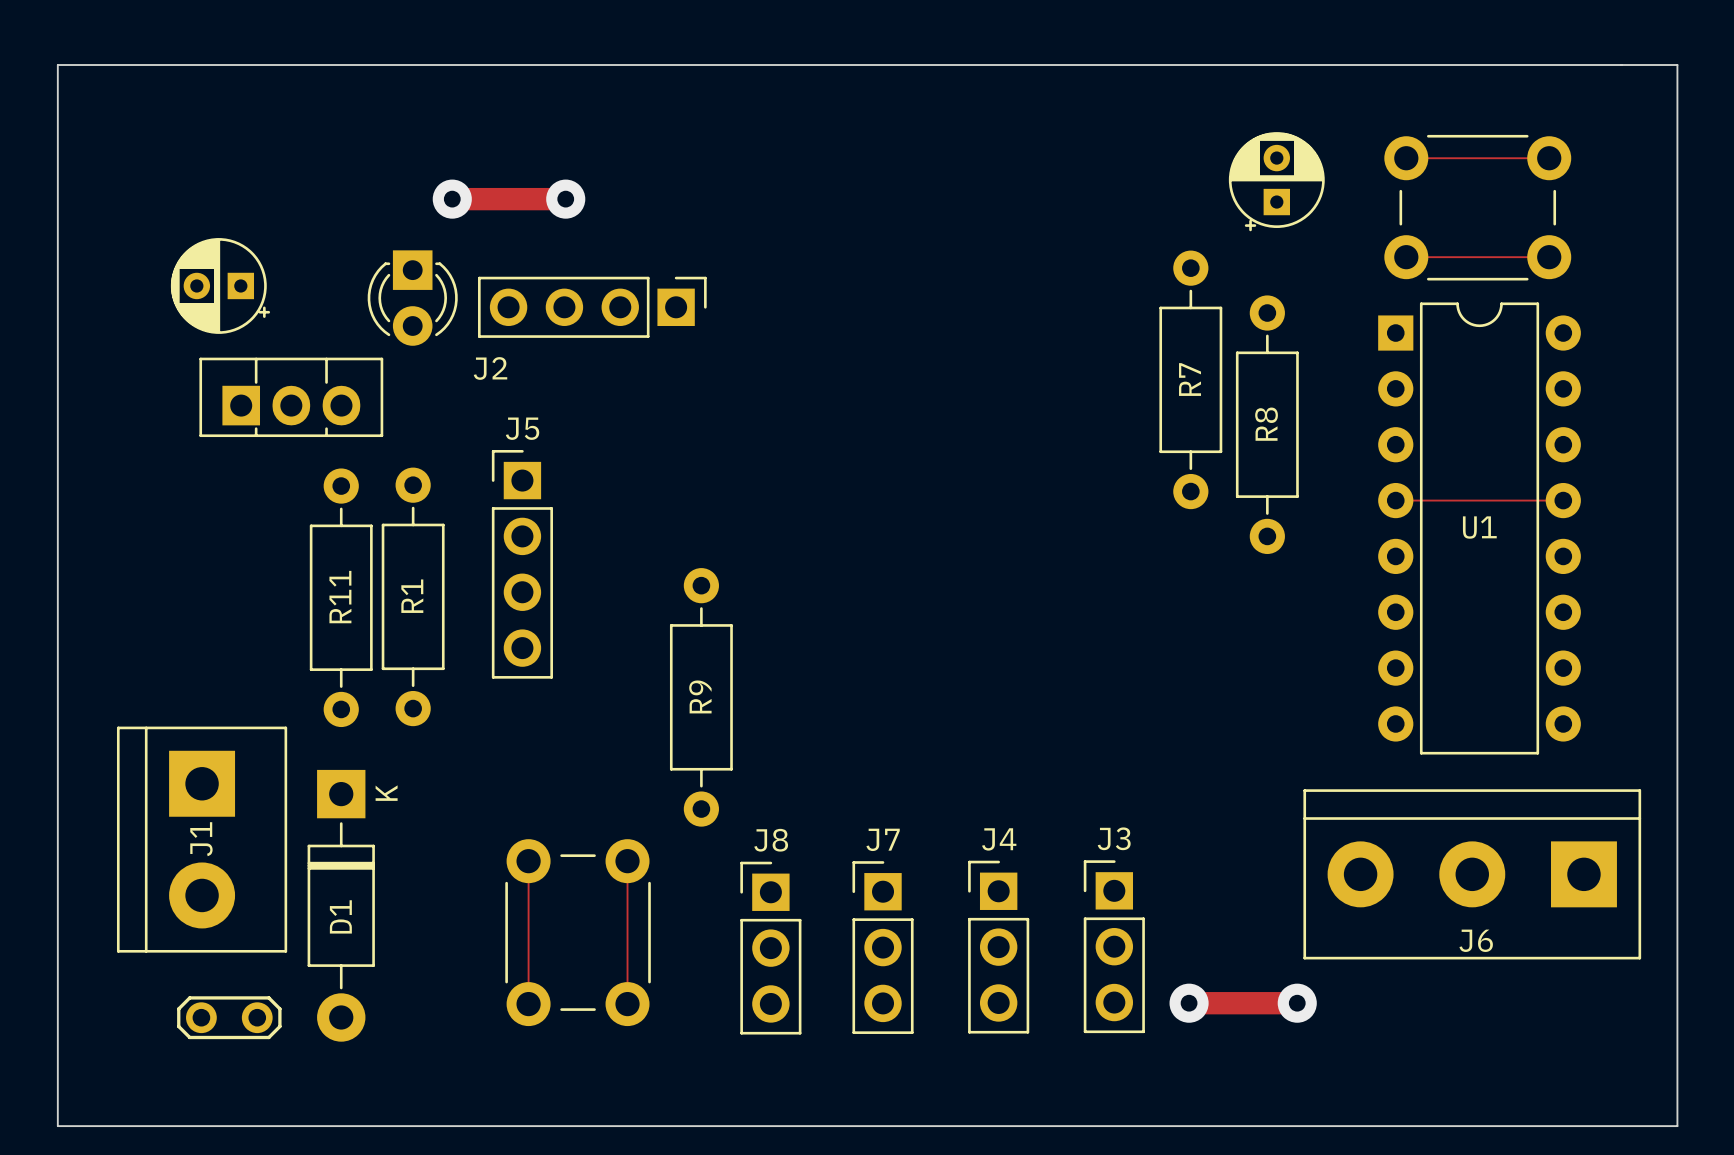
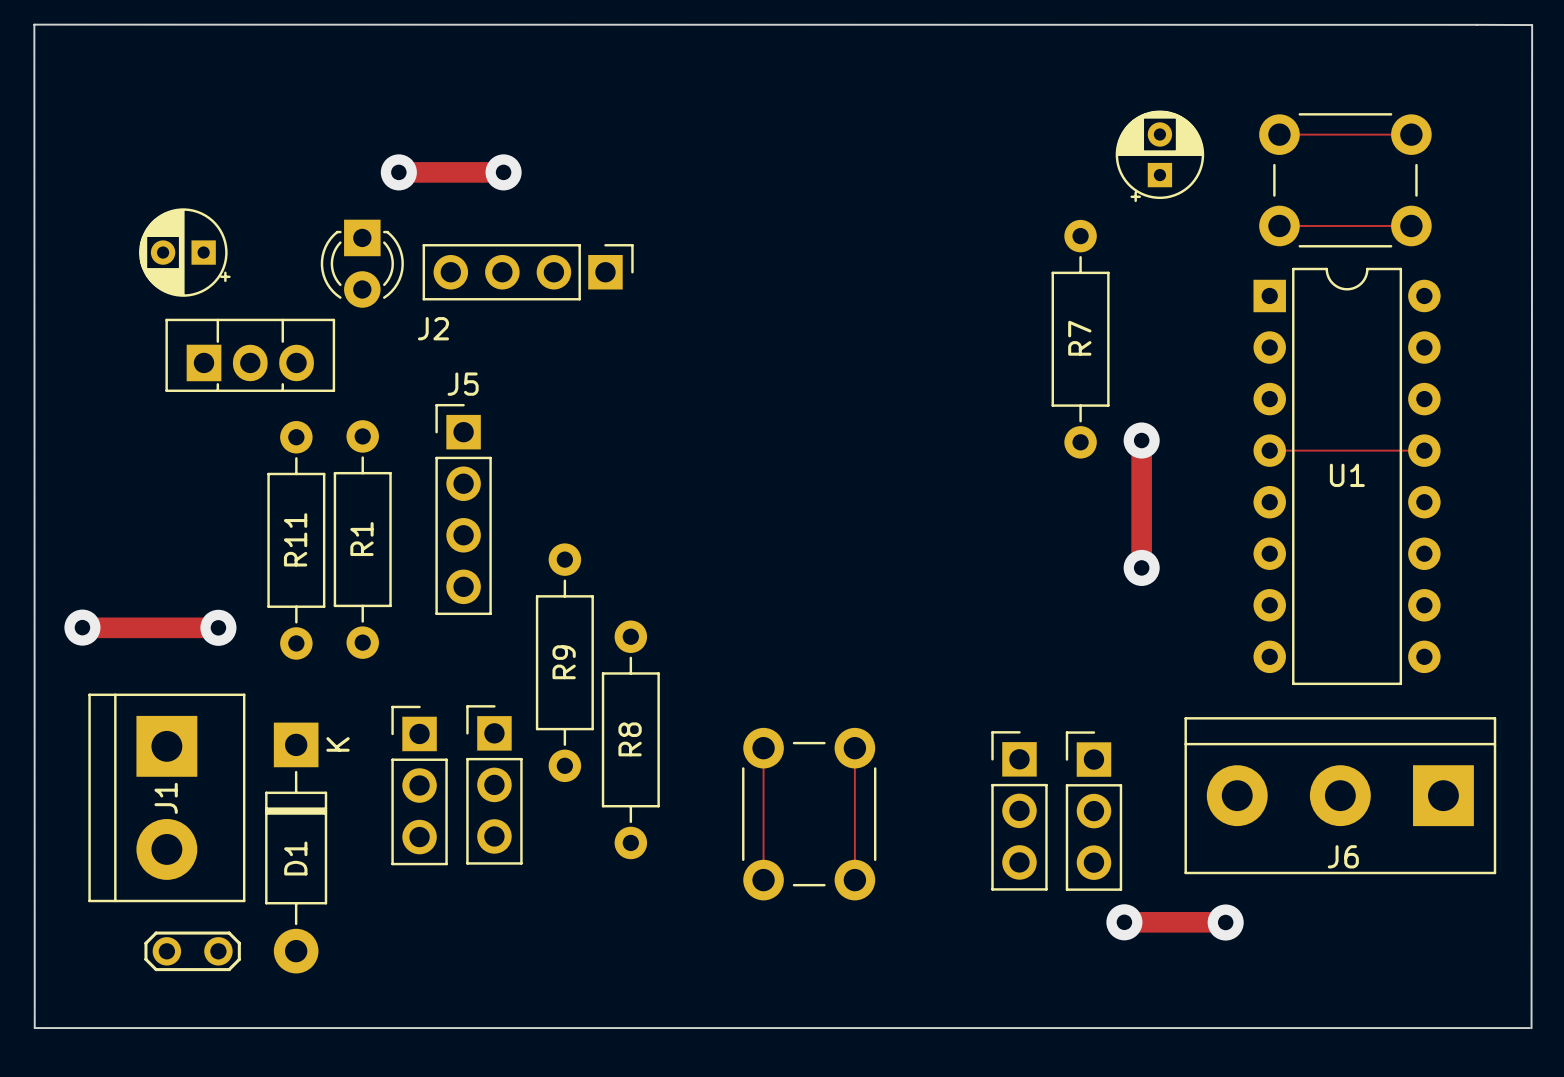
board edge: none -> (1476, 24) (1532, 25) (1531, 1028)
R8 position: (1267, 424) -> (630, 739)
track: none -> (1141, 440) (1141, 567)
via: none -> (1141, 440)
via: none -> (1141, 567)
track: none -> (82, 627) (218, 627)
via: none -> (82, 627)
via: none -> (218, 627)
R9 position: (701, 697) -> (564, 662)
J1 position: (202, 839) -> (166, 797)
track: (528, 861) (528, 1004) -> (763, 748) (763, 880)
track: (627, 861) (627, 1004) -> (854, 748) (854, 880)
part: none -> (494, 784)
part: none -> (419, 785)
part: none -> (1019, 810)
part: none -> (1093, 811)
D1 position: (341, 905) -> (296, 848)
part position: (578, 932) -> (809, 814)
J3: (1114, 946) -> none
J7: (883, 947) -> none
J4: (998, 947) -> none
J8: (770, 948) -> none
track: (1189, 1003) (1297, 1003) -> none
via: (1189, 1003) -> none
via: (1297, 1003) -> none
track: none -> (1124, 922) (1225, 922)
via: none -> (1124, 922)
via: none -> (1225, 922)
part position: (229, 1017) -> (192, 951)
board edge: (57, 1126) (57, 65) (1677, 65) (1677, 1126) -> (34, 1028) (34, 24) (1476, 24)

